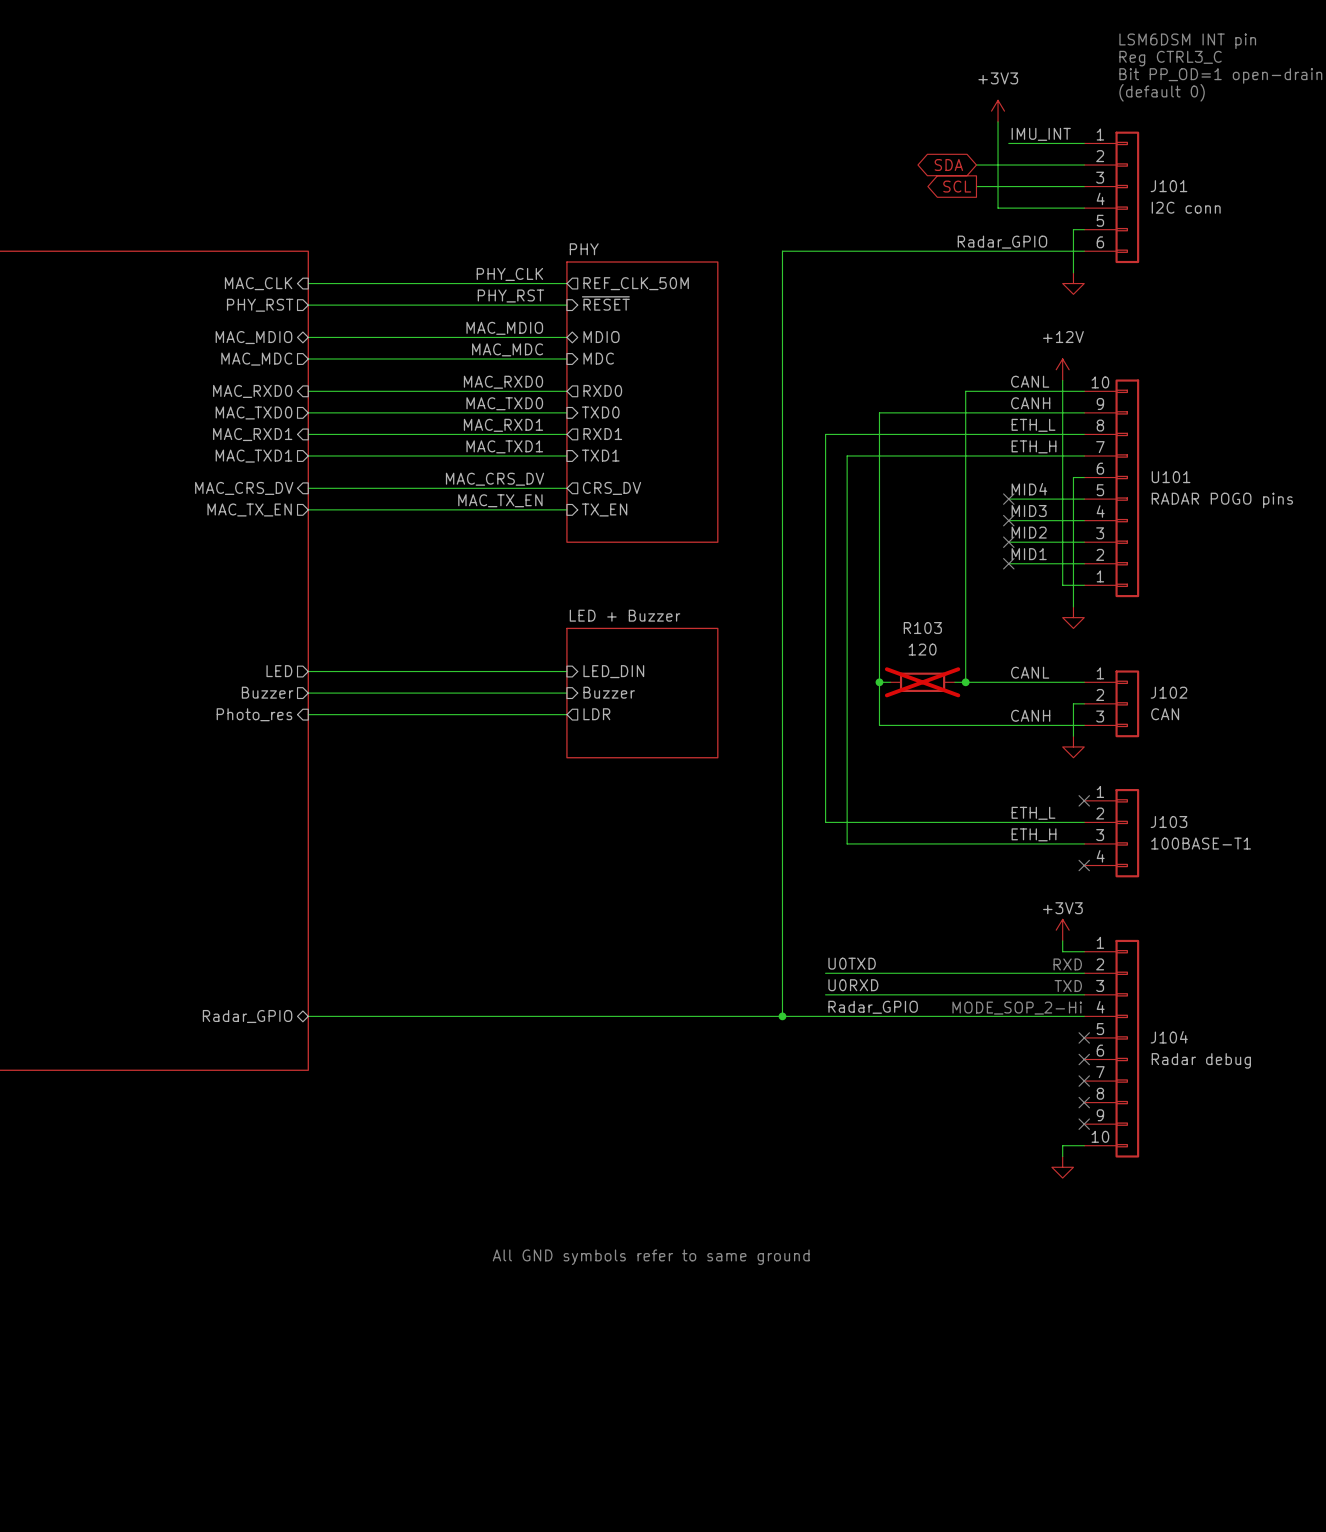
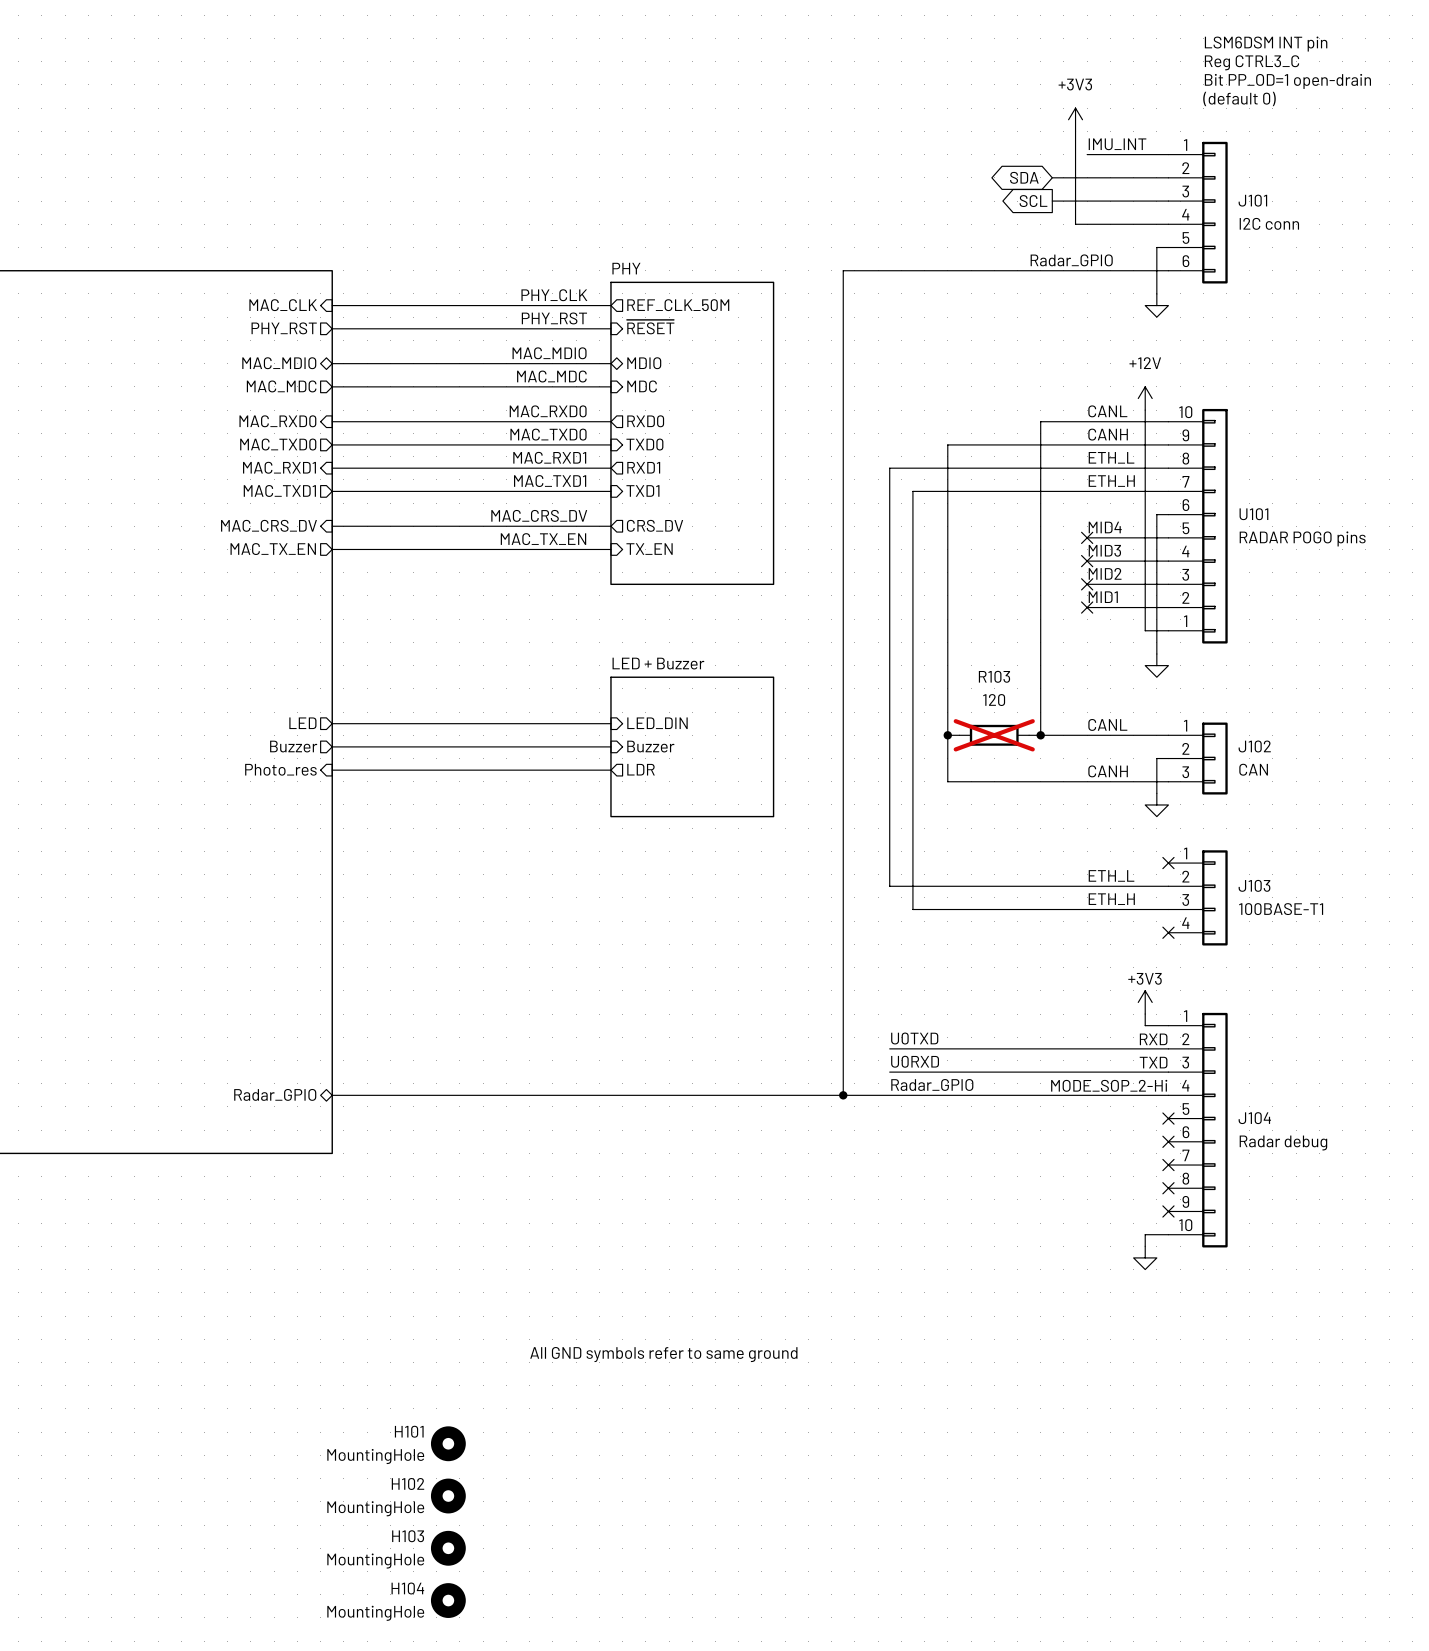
H101: none -> MountingHole (448, 1443)
H102: none -> MountingHole (448, 1496)
H103: none -> MountingHole (448, 1548)
H104: none -> MountingHole (448, 1600)

